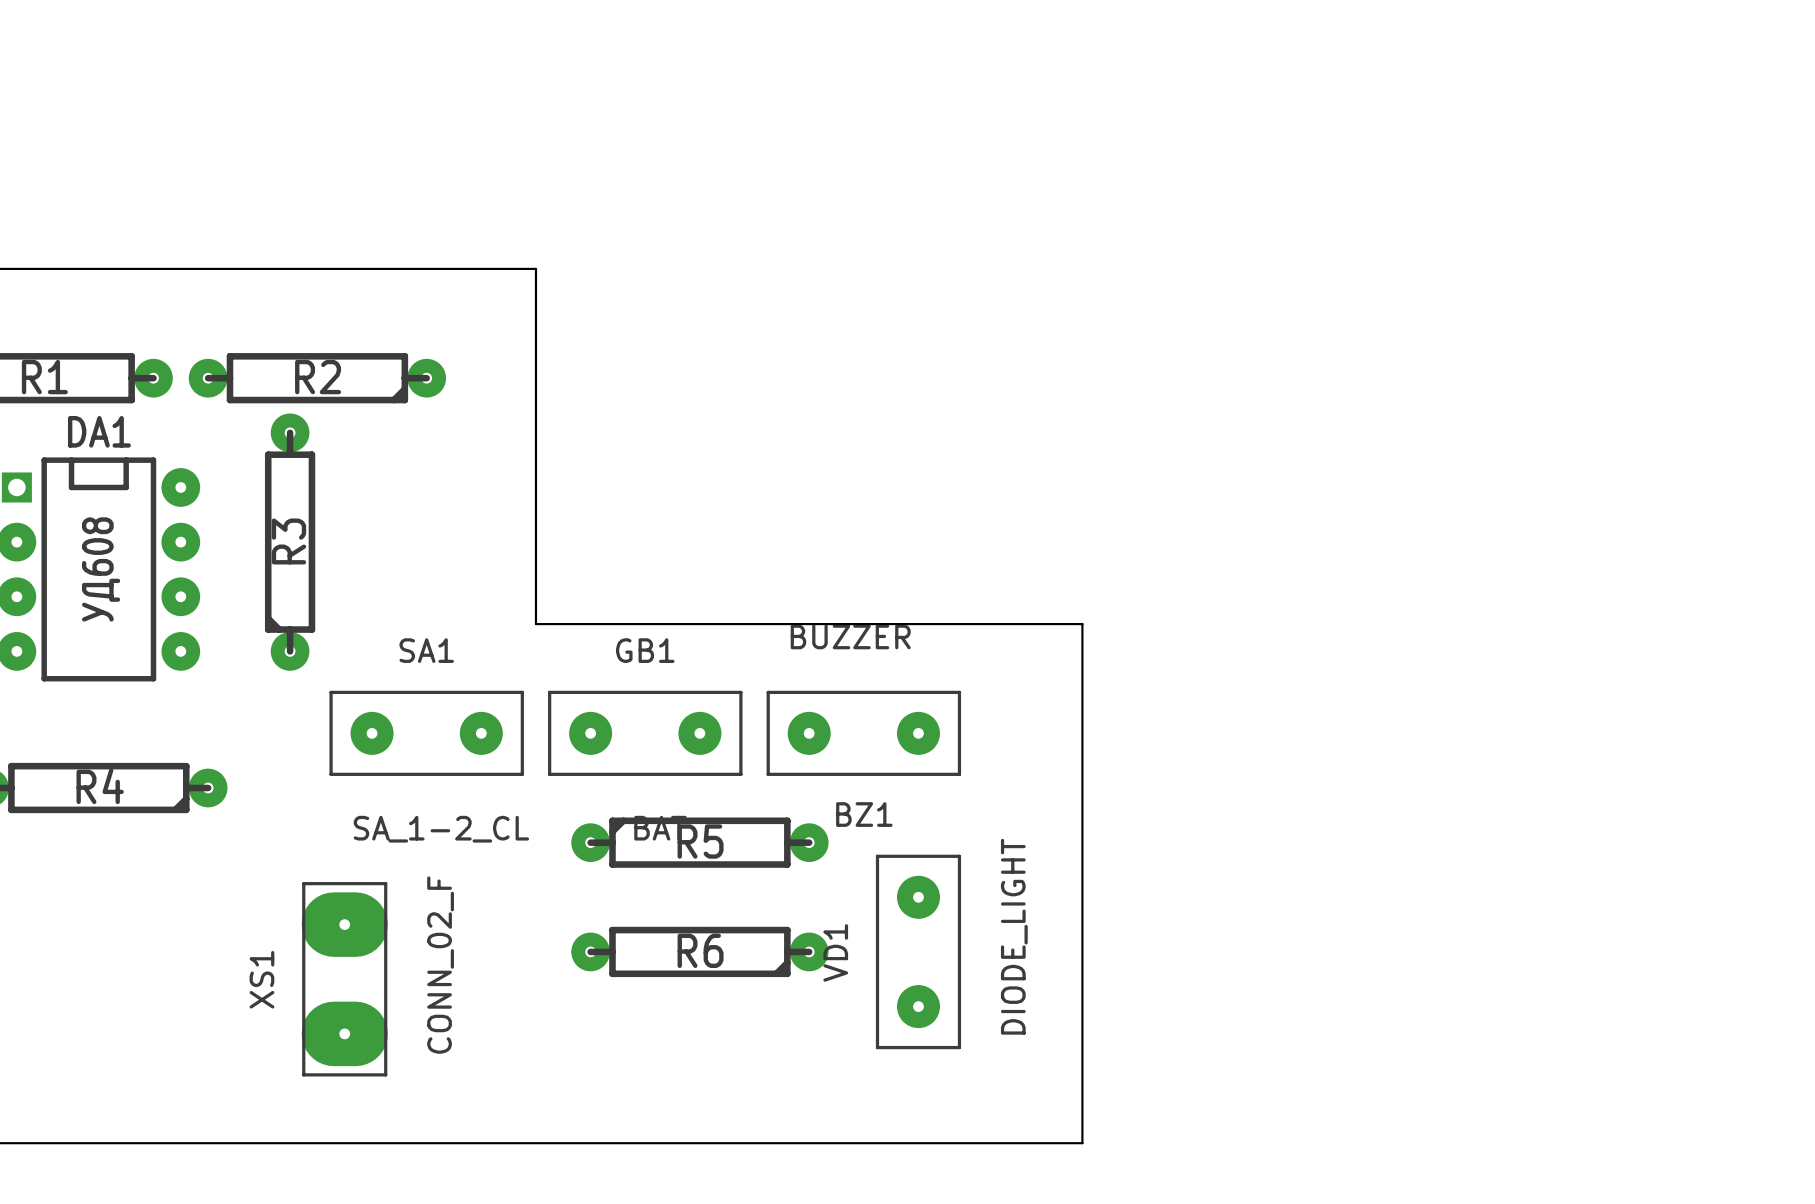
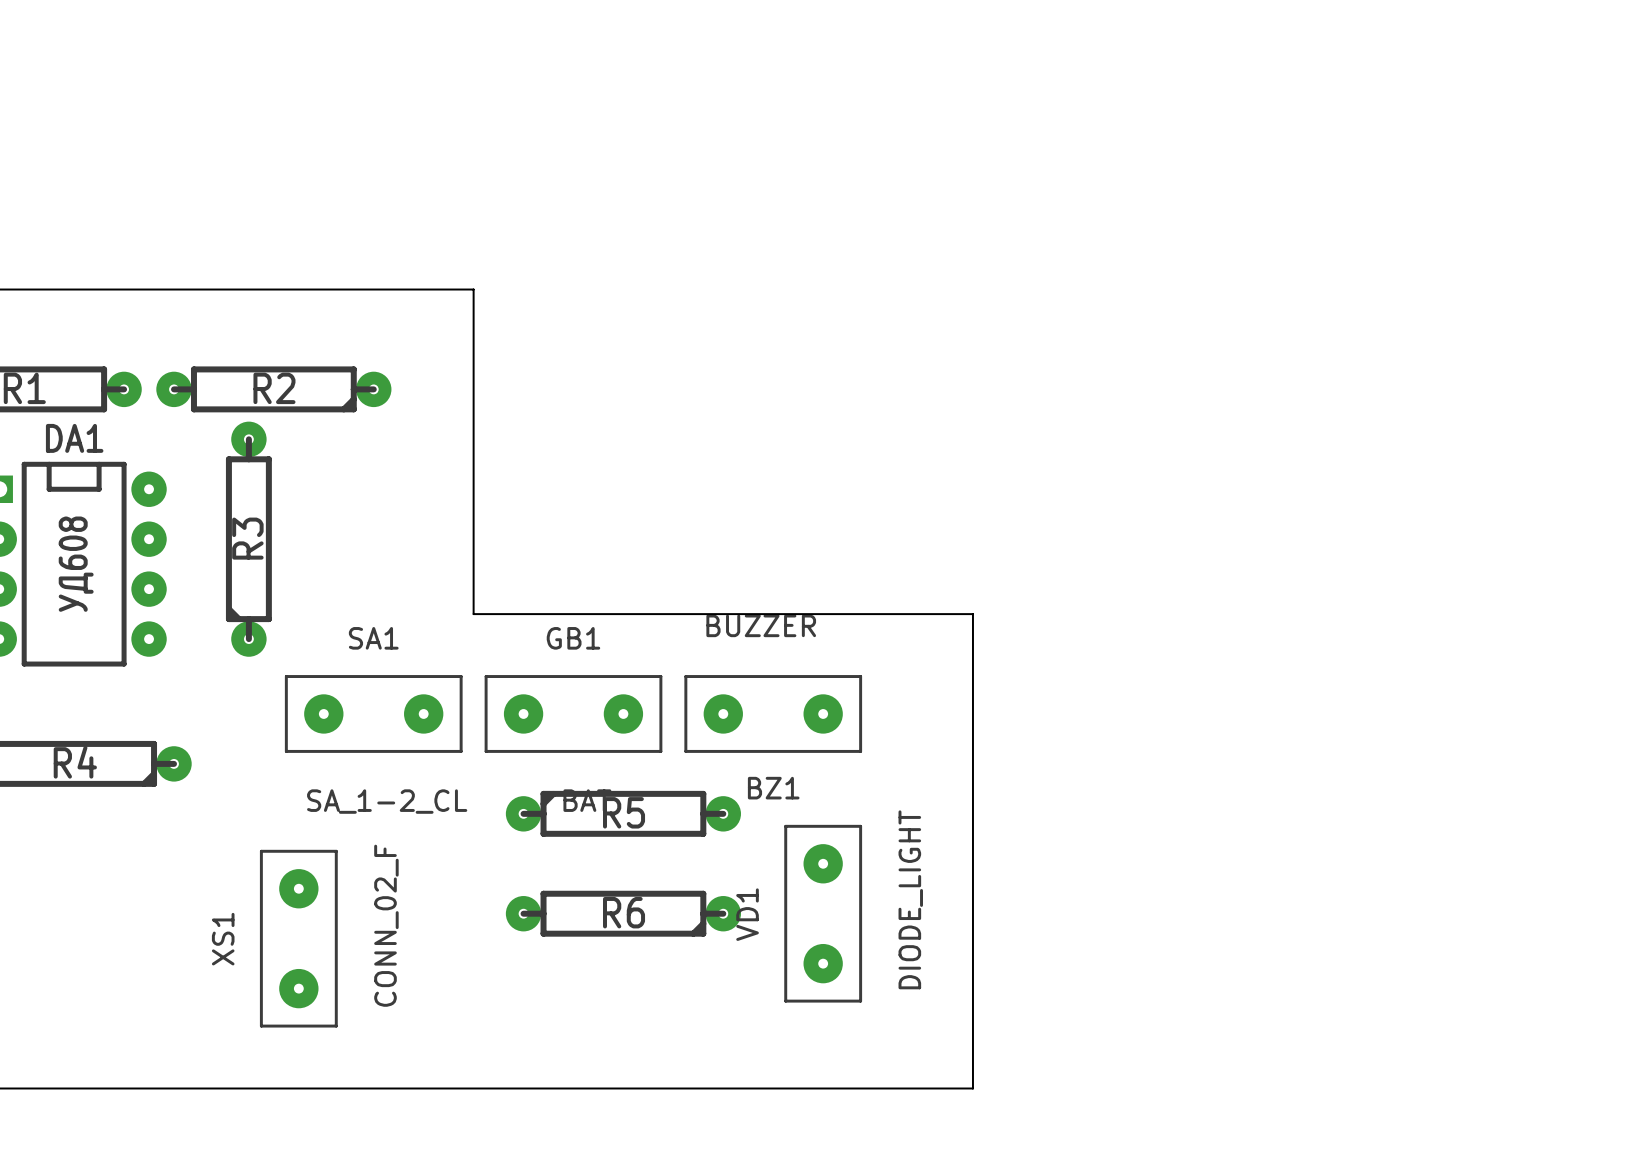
XS1 footprint: [301, 882, 388, 1077] -> [259, 849, 338, 1028]

